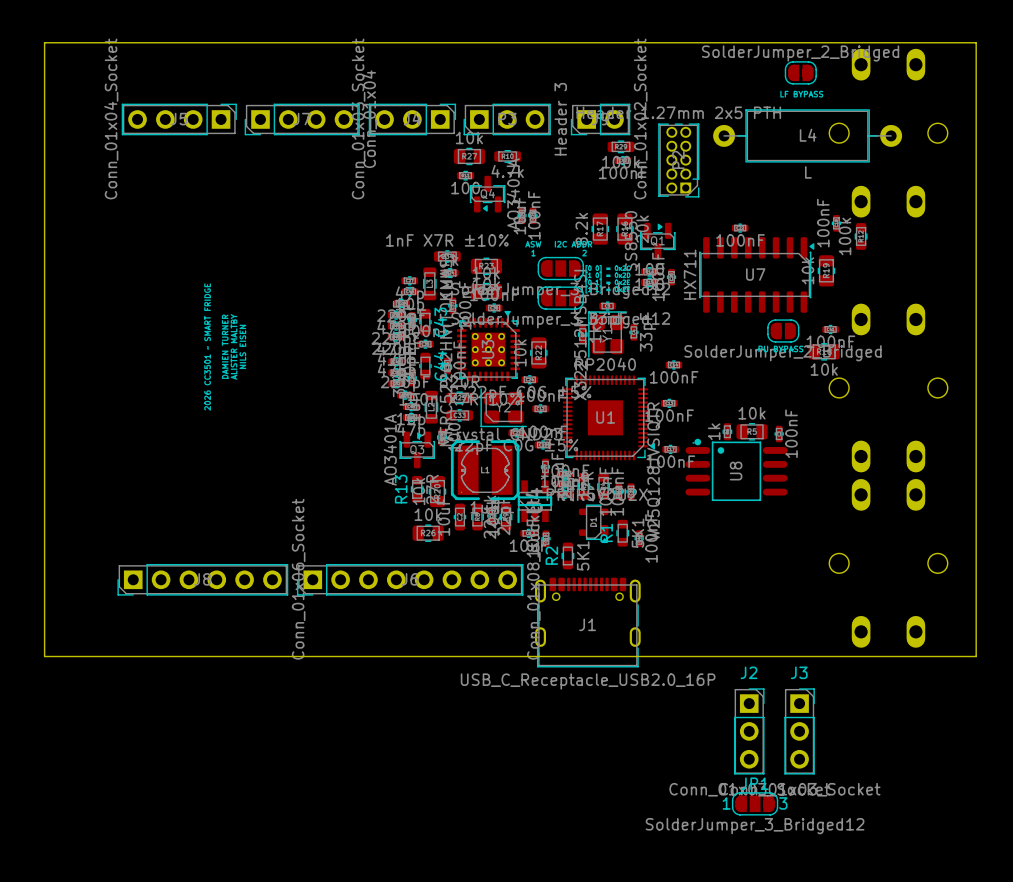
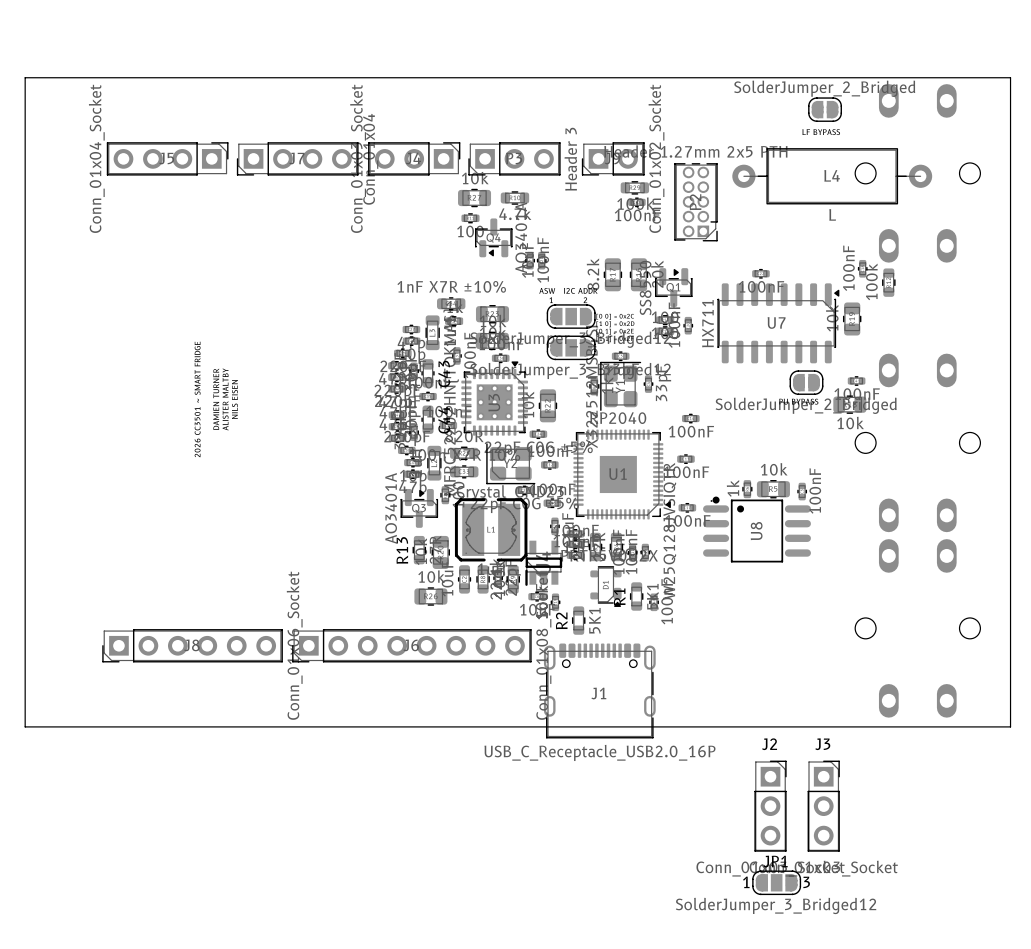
part rotation: 0° (447, 366) -> 90° clockwise (448, 425)

